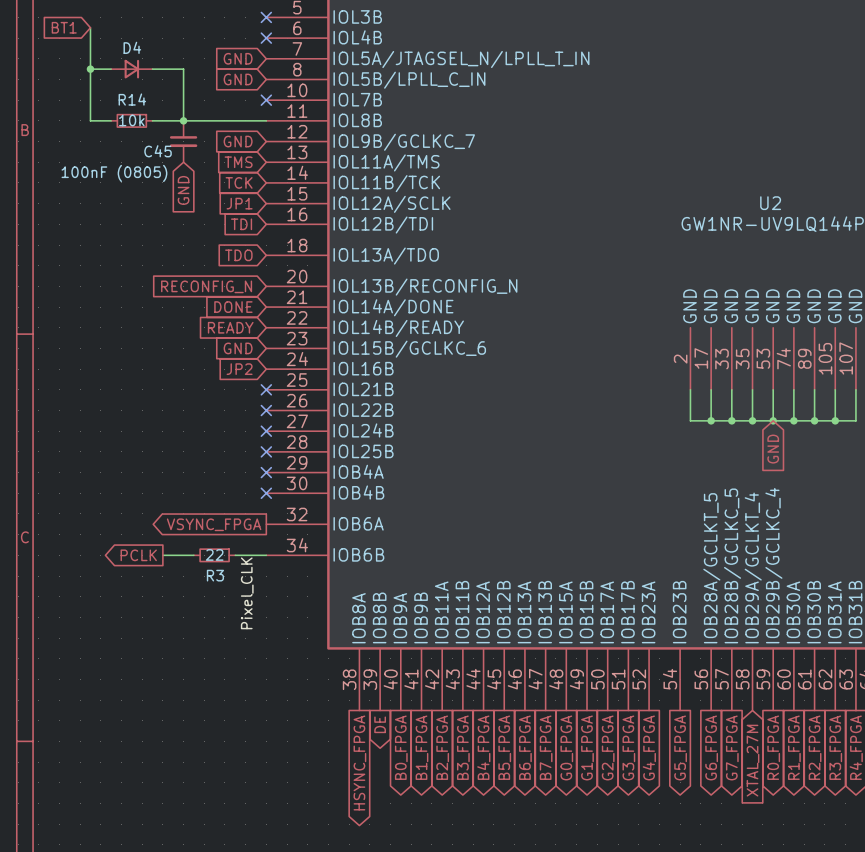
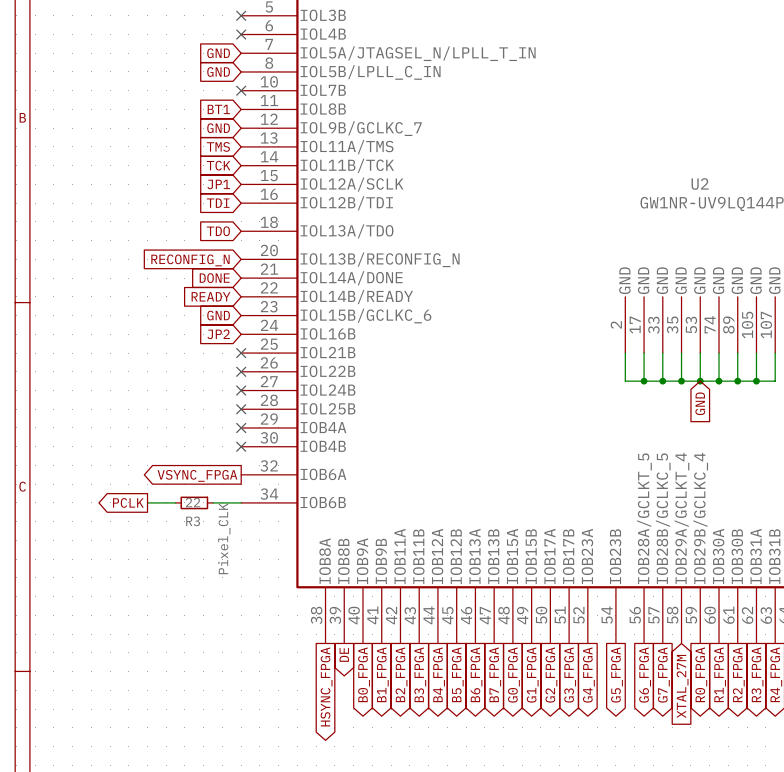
global label position: BT1 (64, 27) -> BT1 (218, 109)
wire: (90, 27) (90, 120) (111, 120) -> none
wire: (90, 69) (111, 69) -> none
junction: (90, 69) -> none
D4: (131, 69) -> none
wire: (152, 69) (183, 69) (183, 120) -> none
R14: 10k (131, 120) -> none
wire: (152, 120) (266, 120) -> none
junction: (183, 120) -> none
C45: 100nF (0805) (183, 141) -> none
global label: GND (183, 190) -> none

